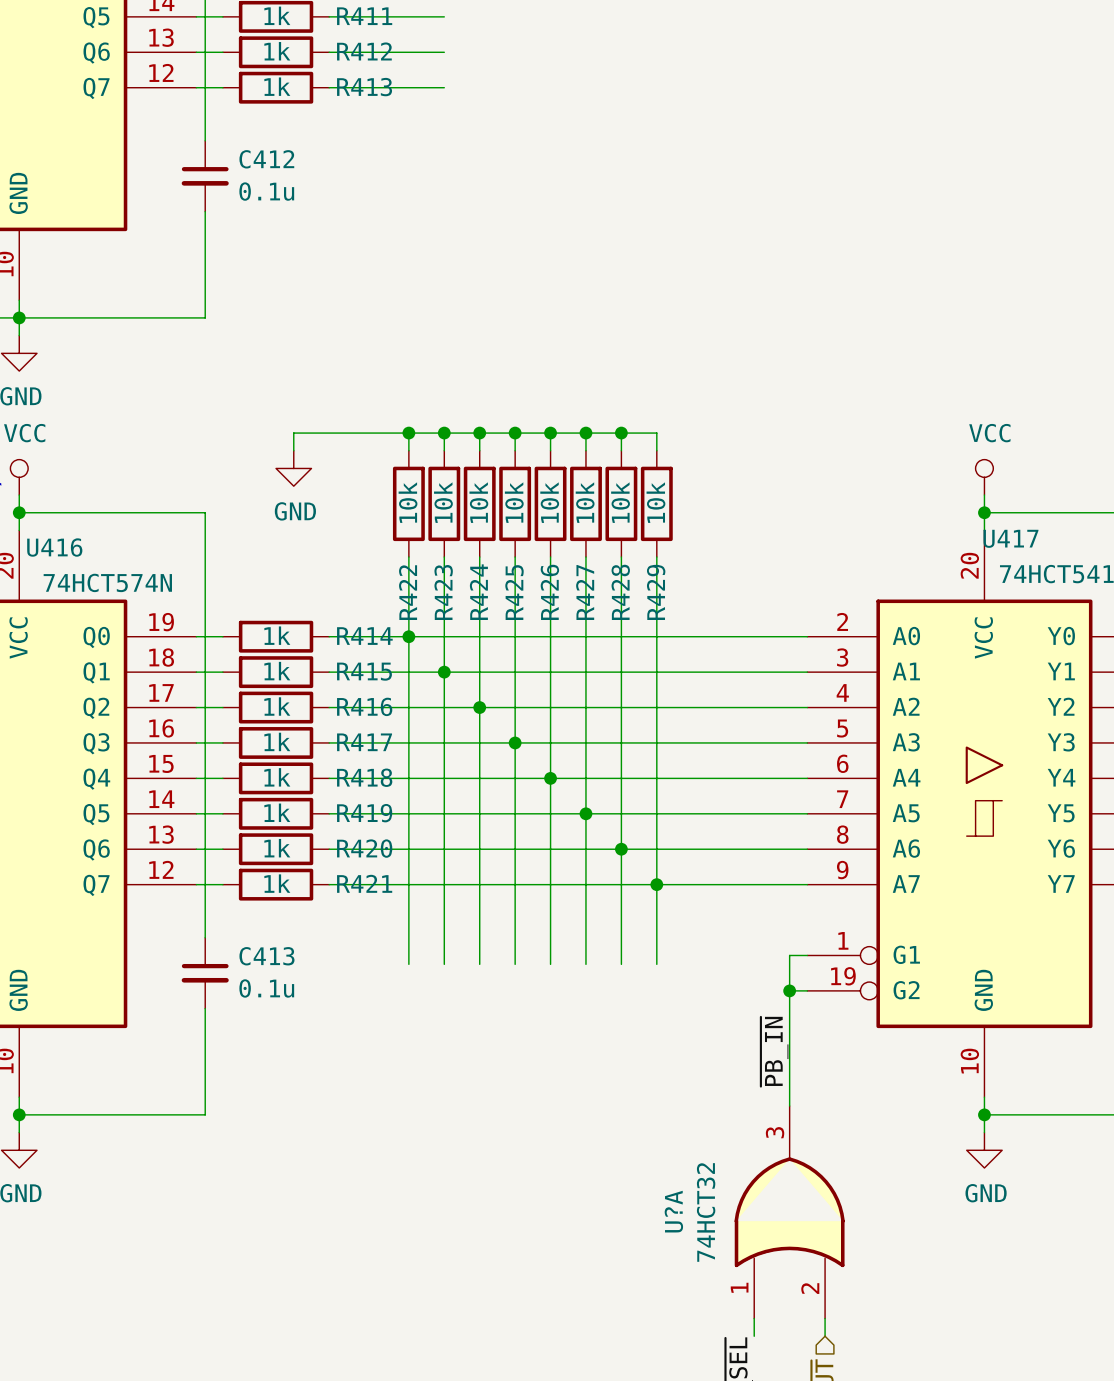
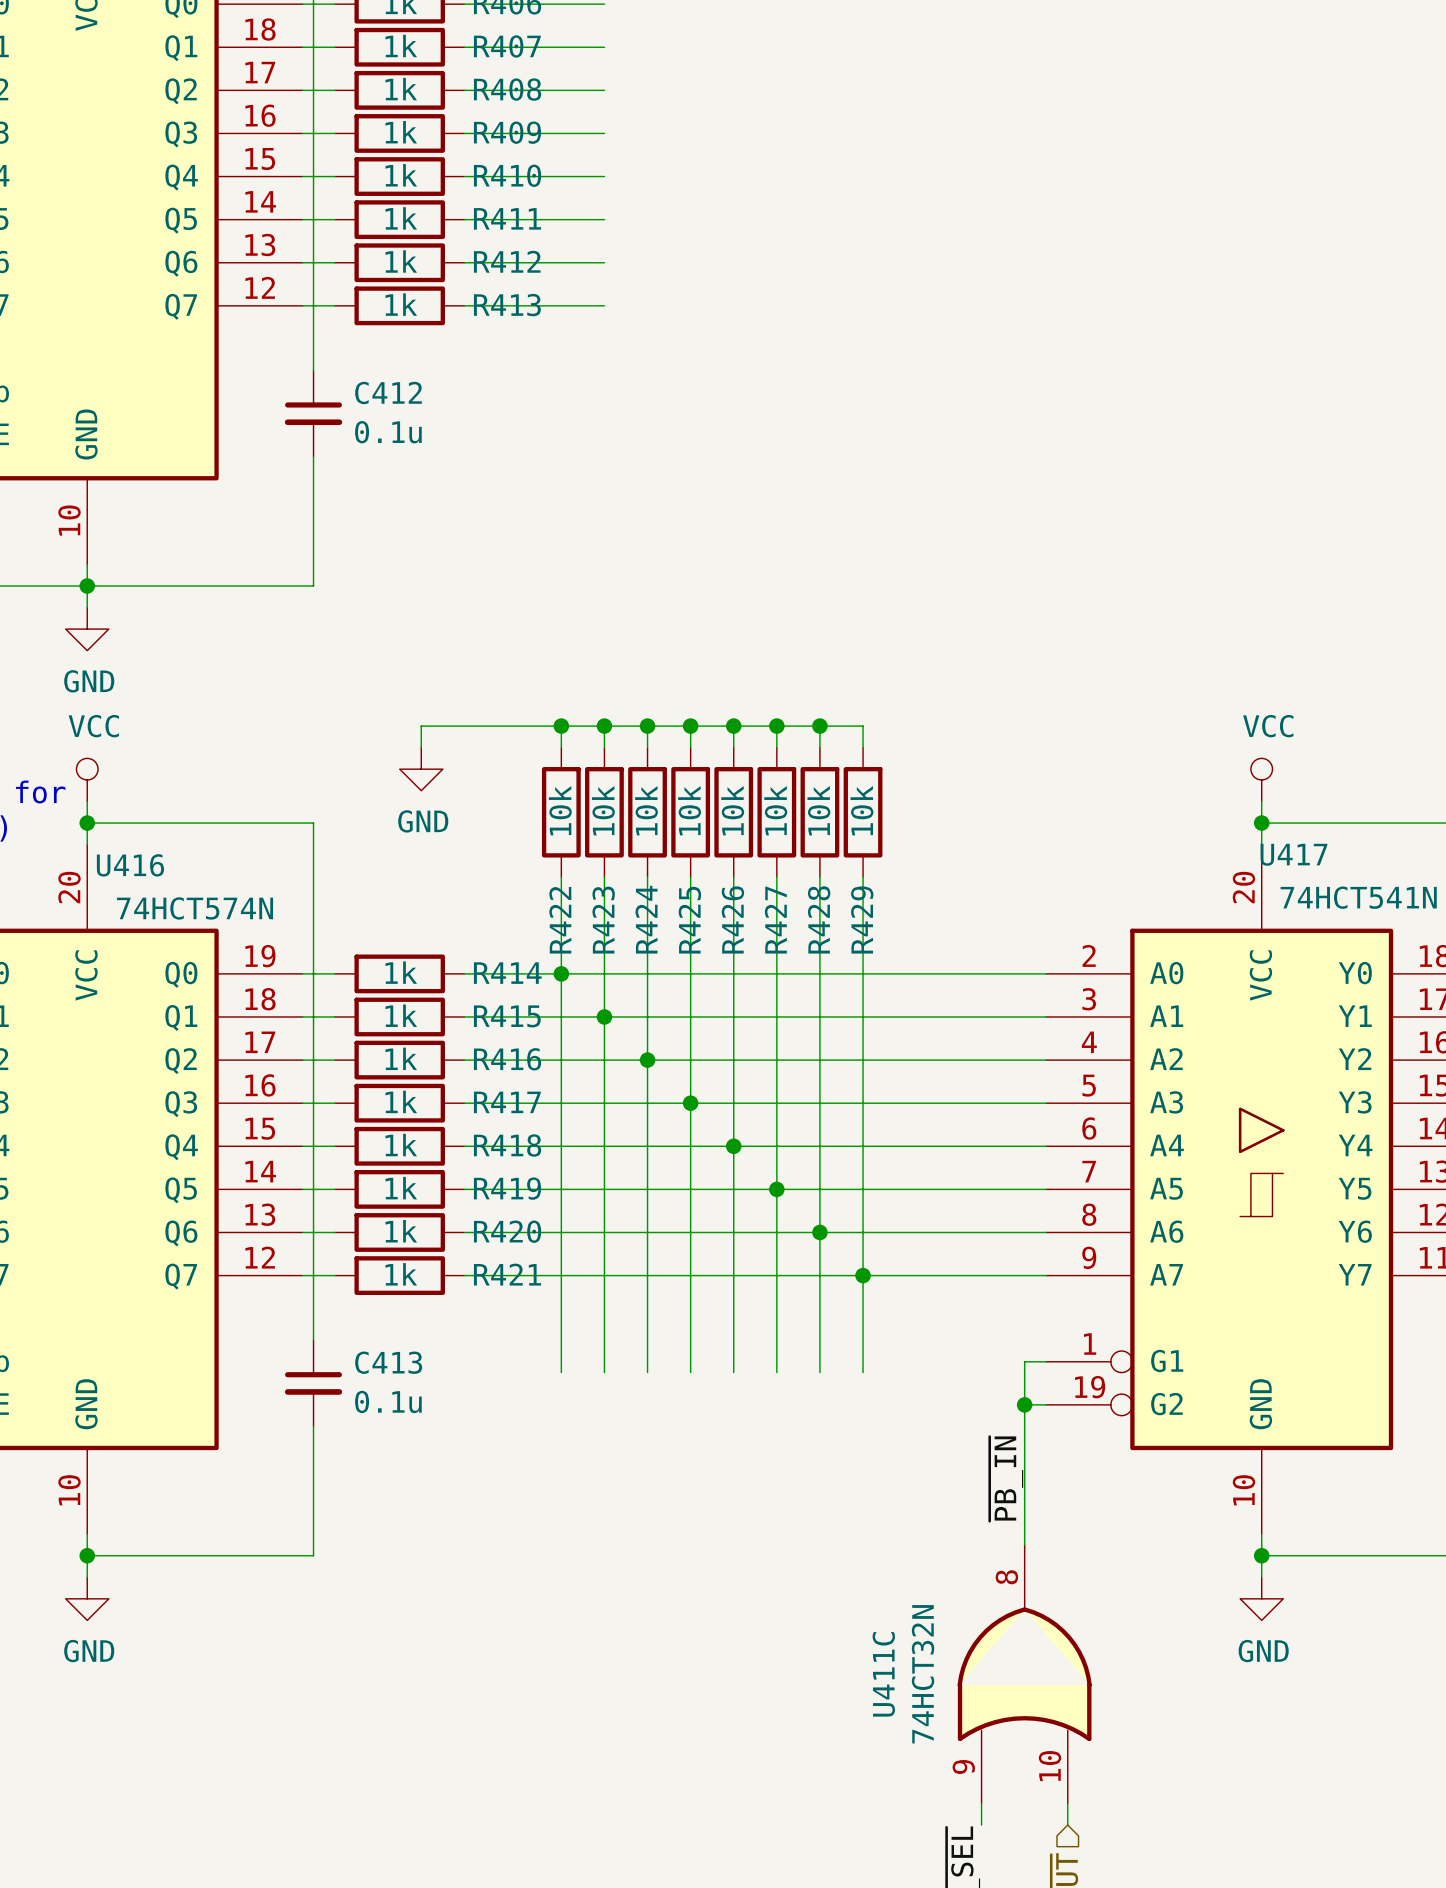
U?A pin number: 3 (775, 1132) -> 8 (1006, 1577)
U?A name: U?A (673, 1211) -> U411C (883, 1674)
U?A value: 74HCT32 (706, 1212) -> 74HCT32N (923, 1674)
U?A pin number: 1 (739, 1287) -> 9 (963, 1767)
U?A pin number: 2 (810, 1288) -> 10 (1050, 1766)

